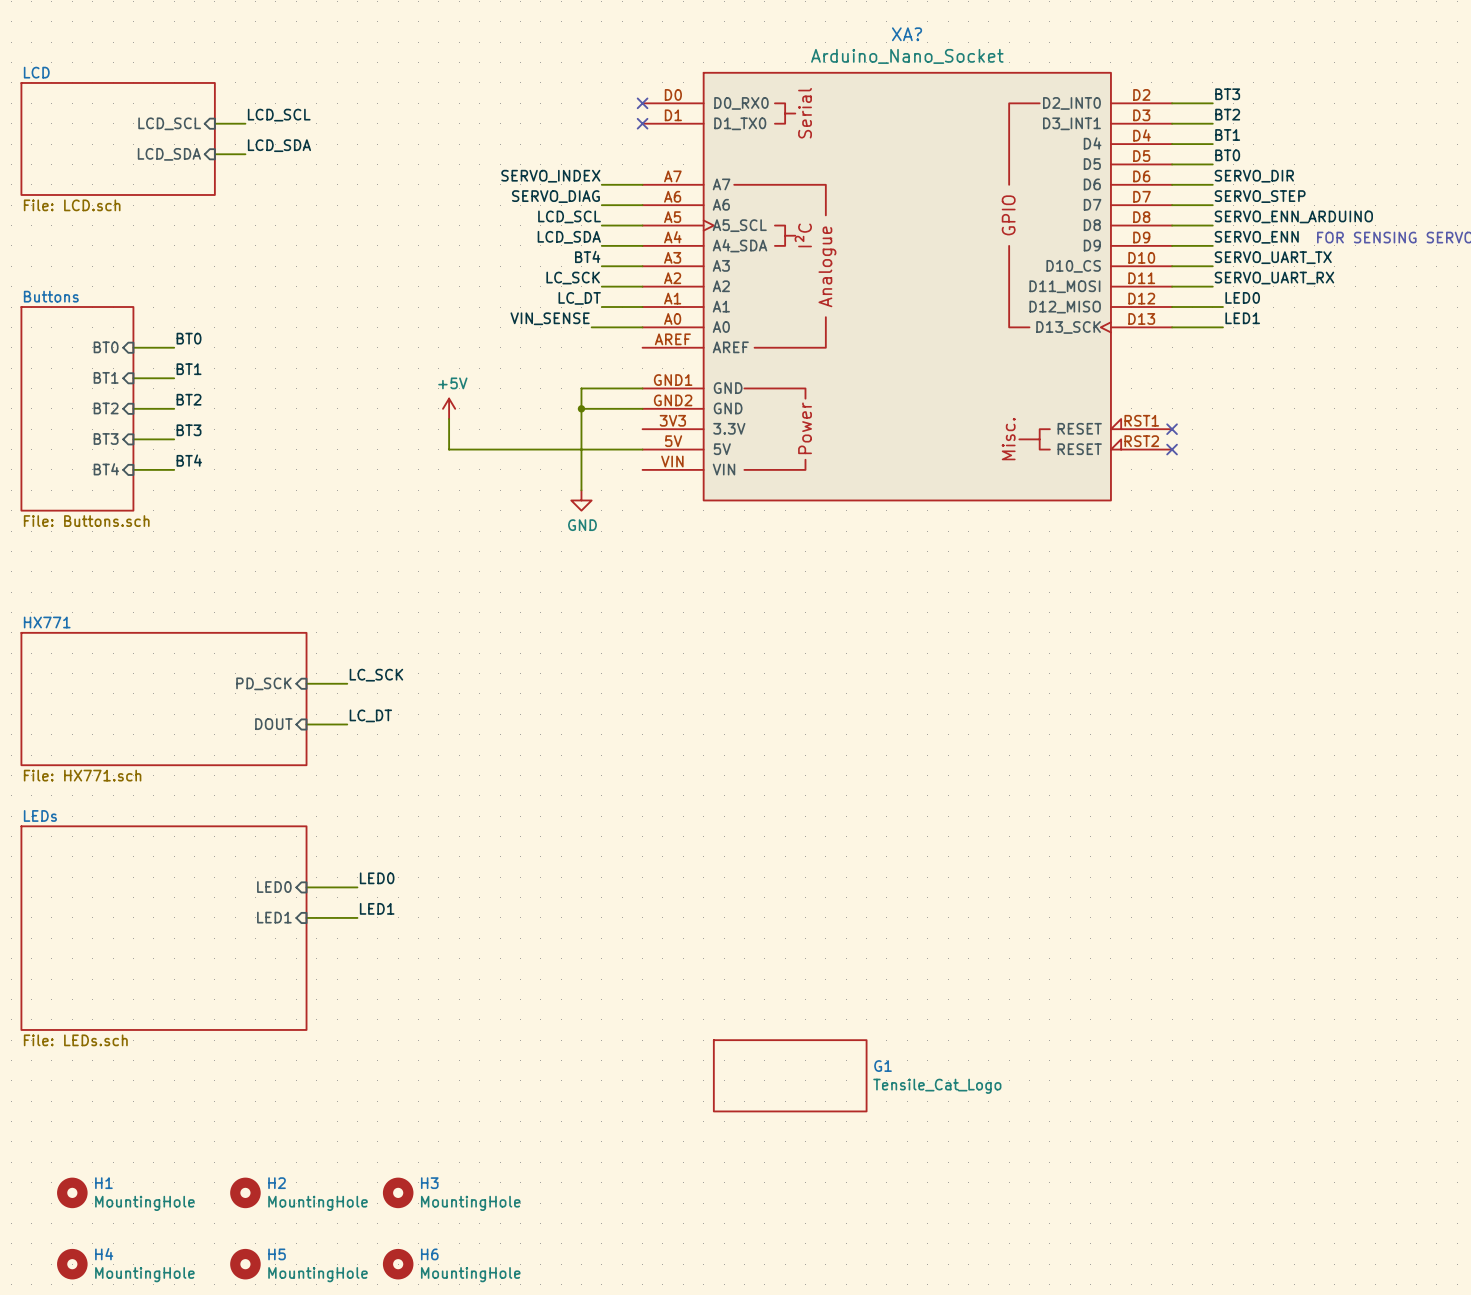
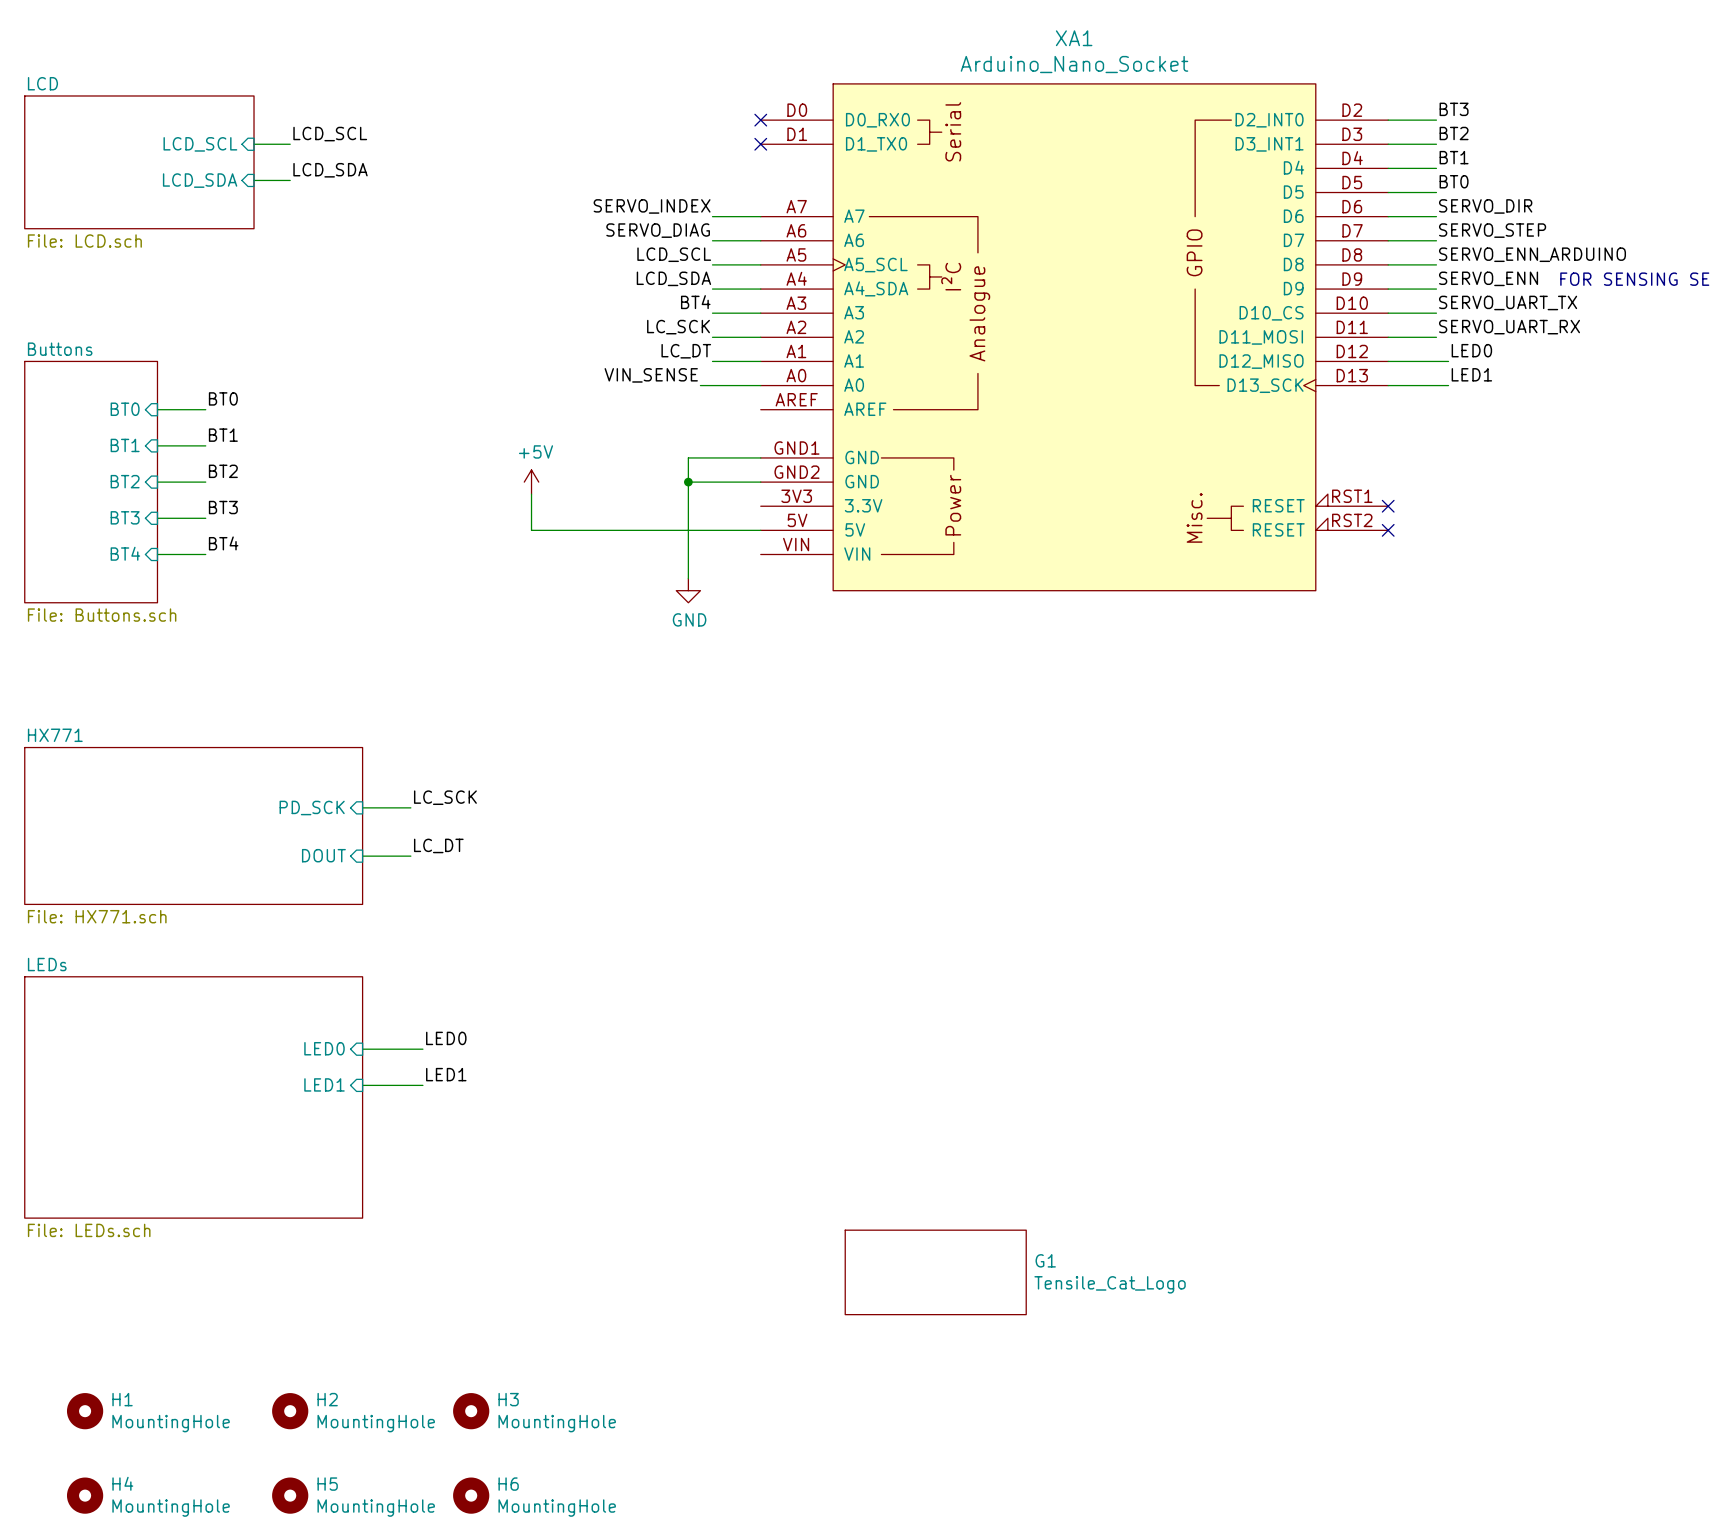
XA? name: XA? (907, 34) -> XA1 (1074, 38)

